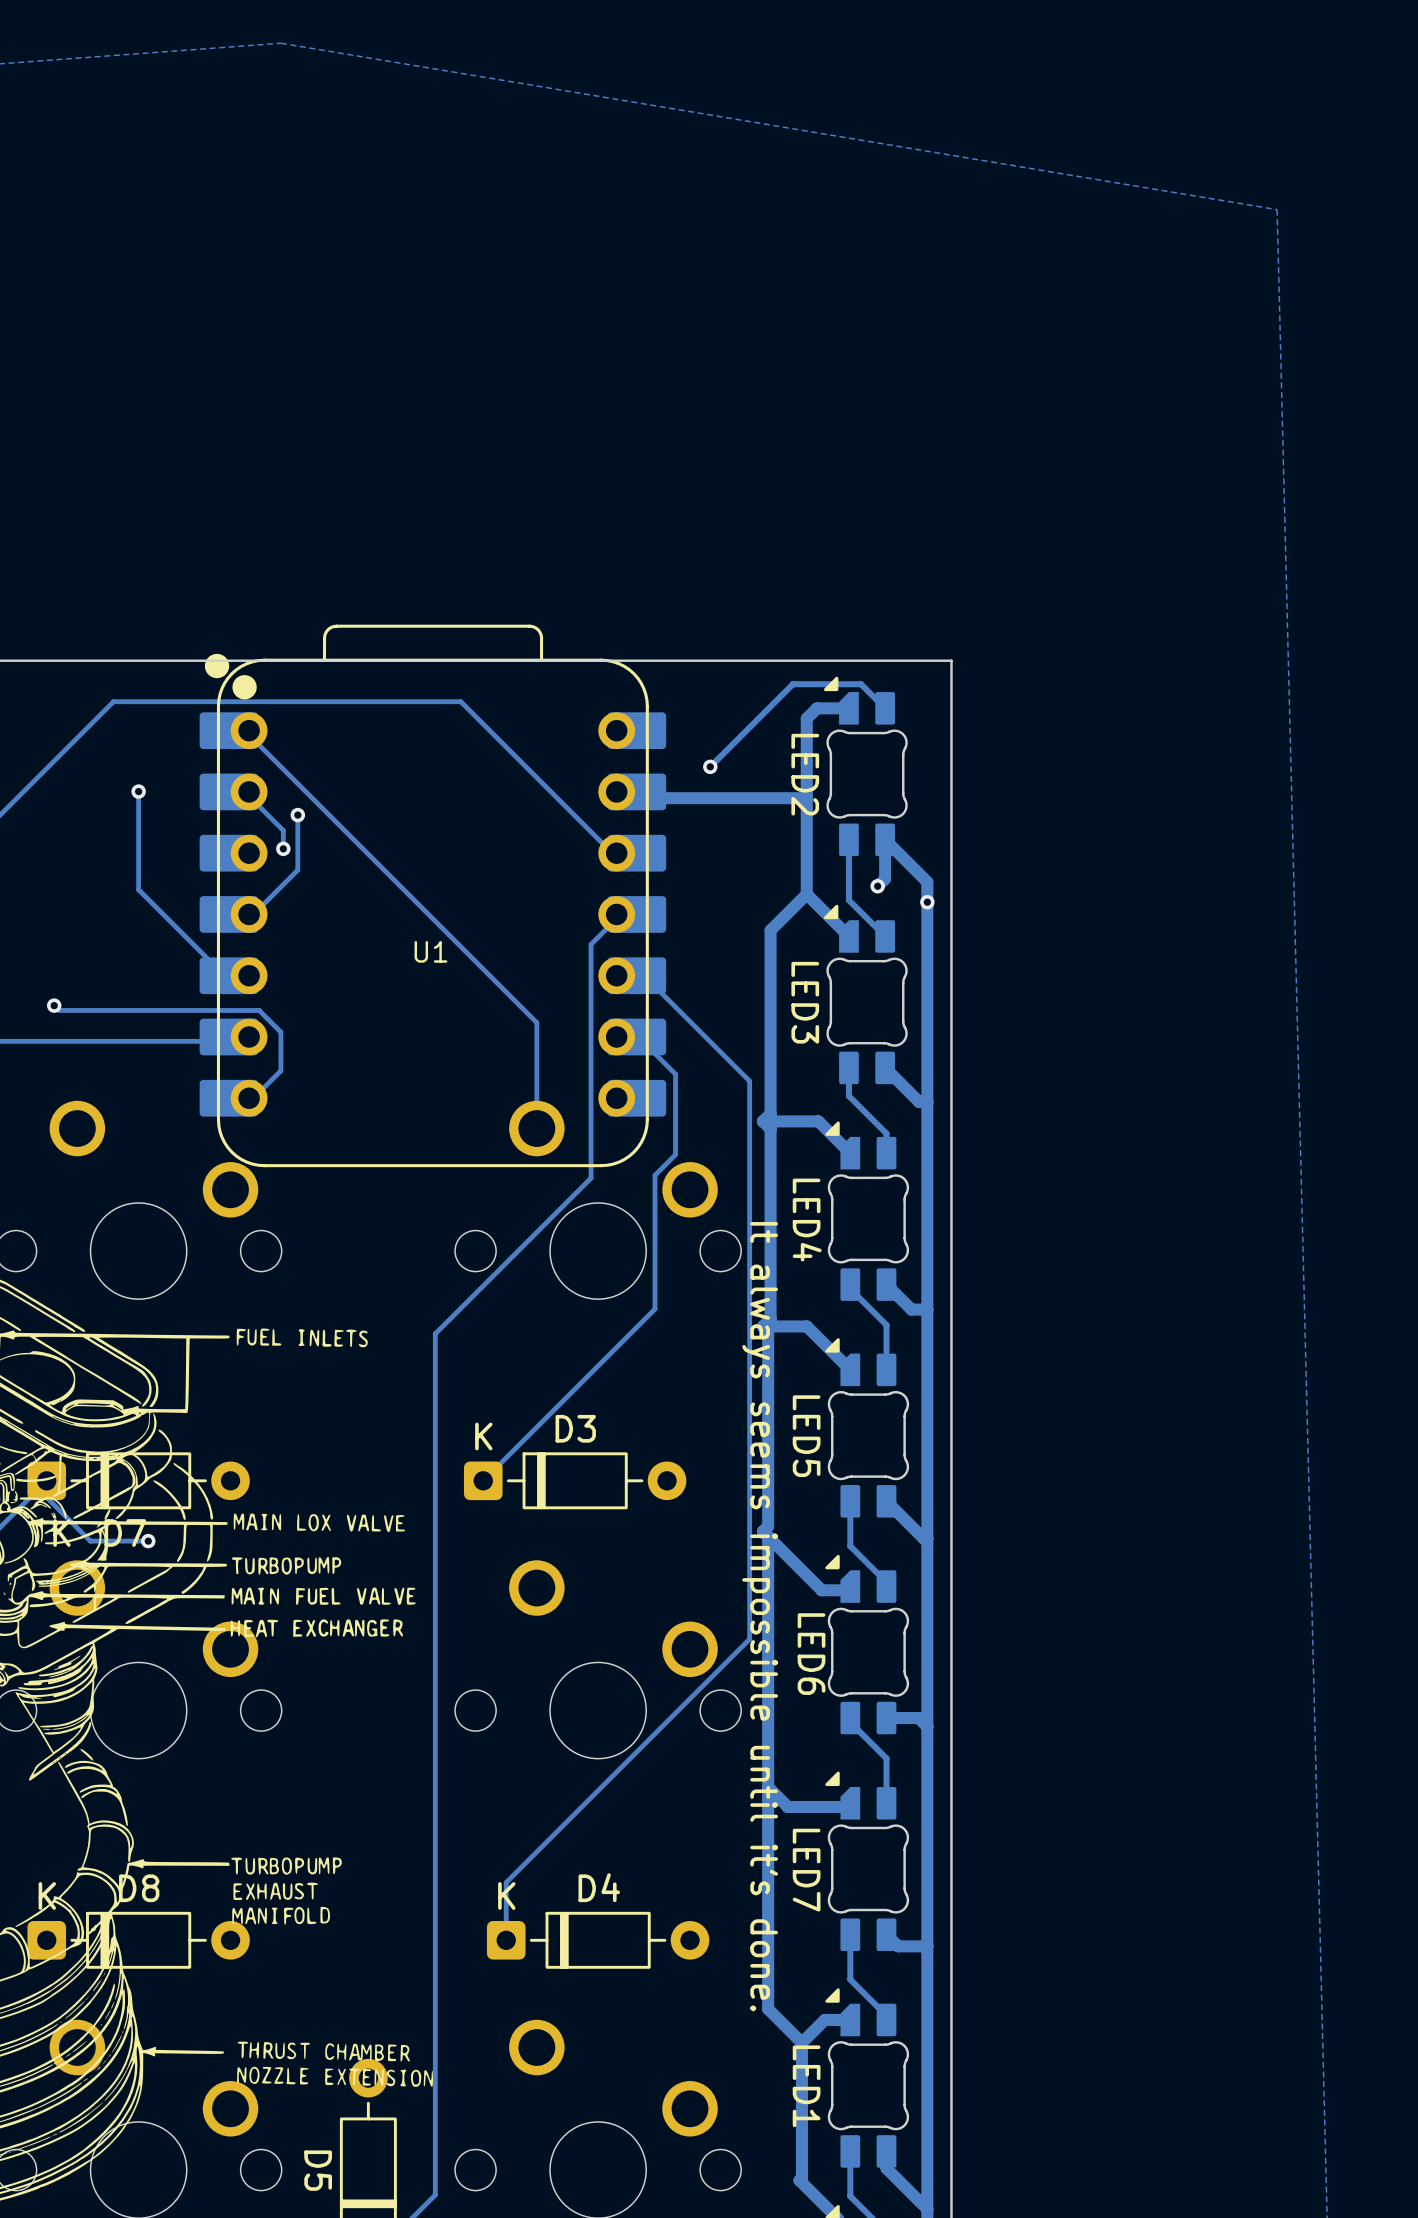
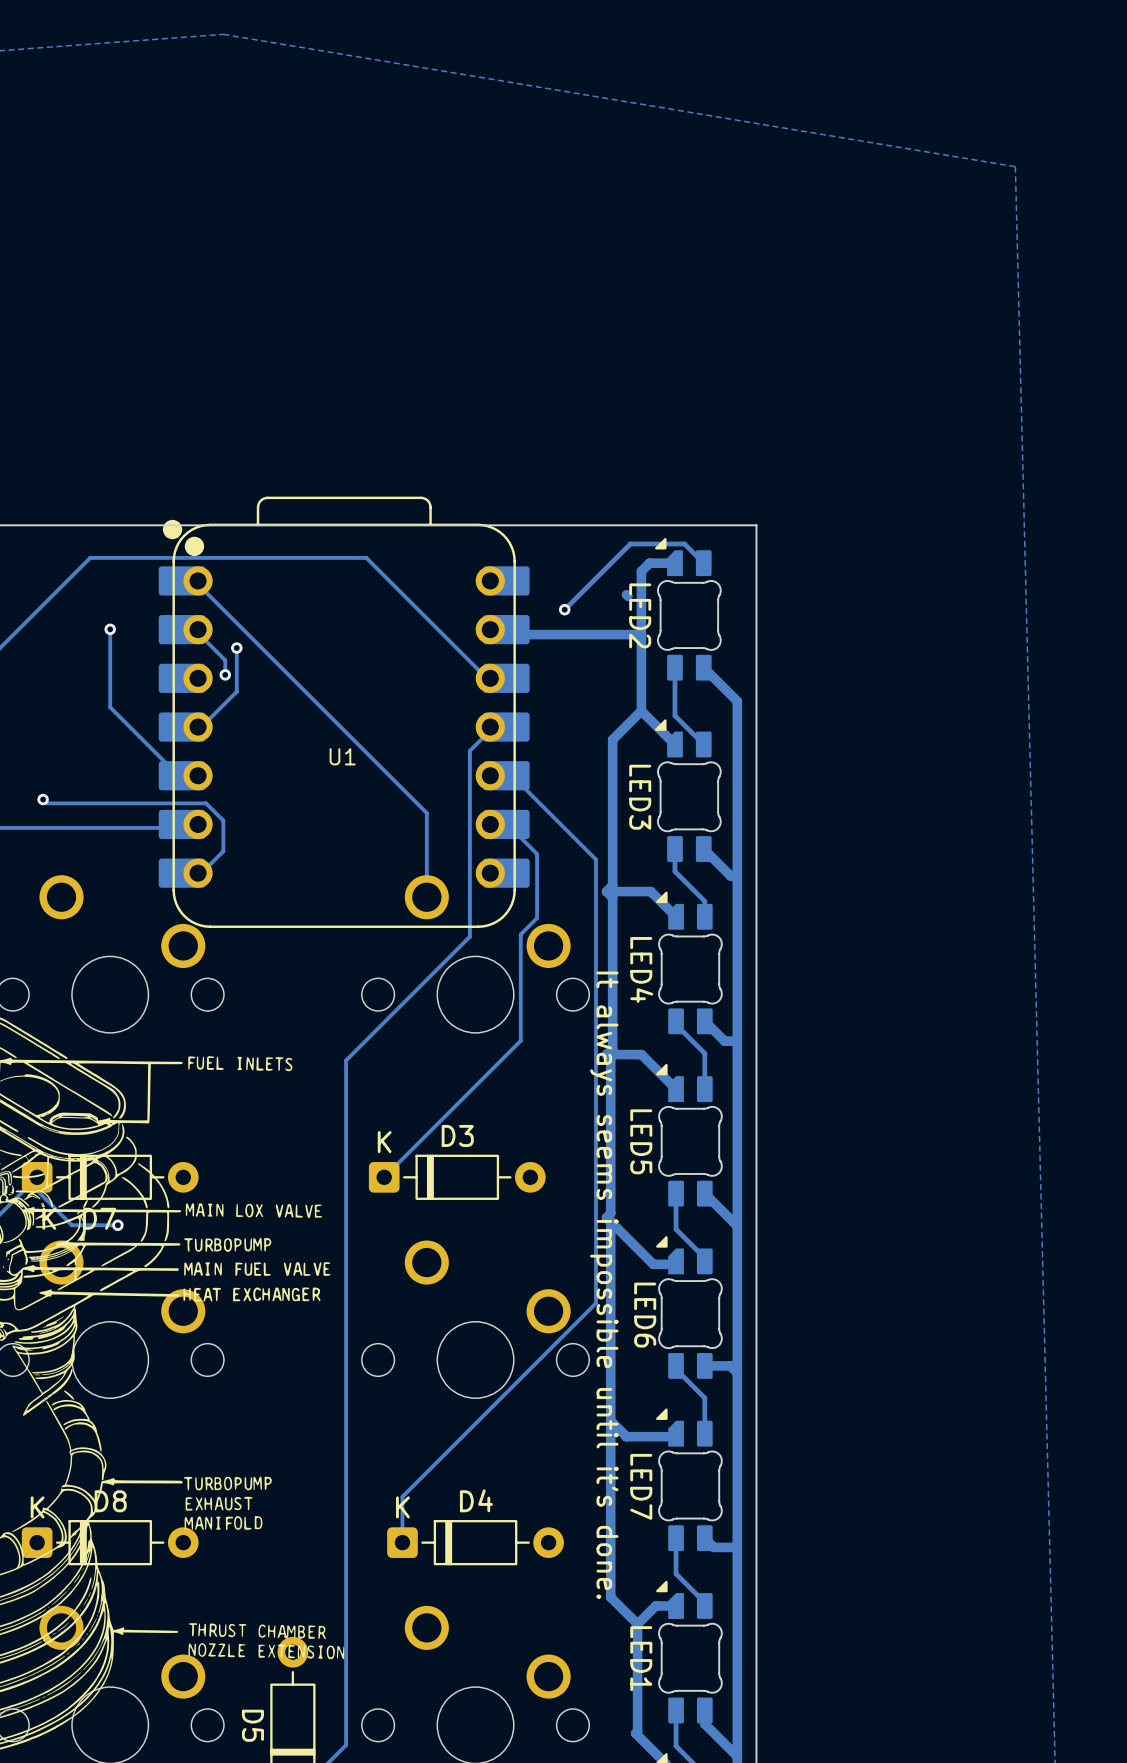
track: none -> (626, 594) (627, 596)
track: (885, 839) (885, 878) (877, 886) -> none
via: (877, 886) -> none
via: (927, 902) -> none

